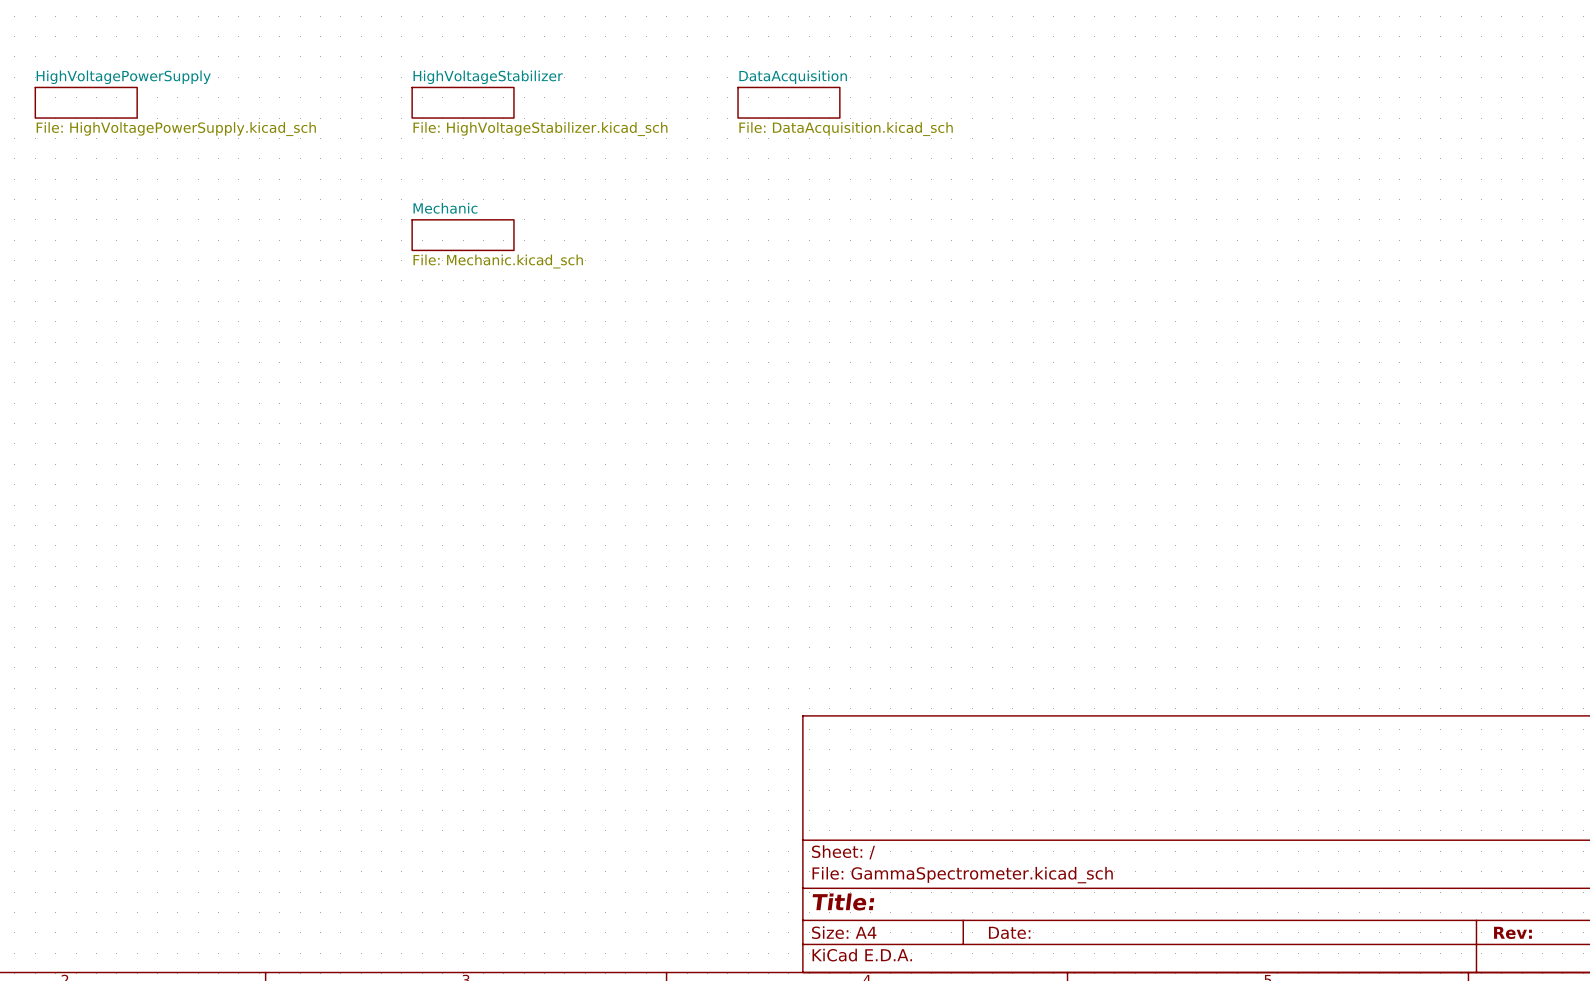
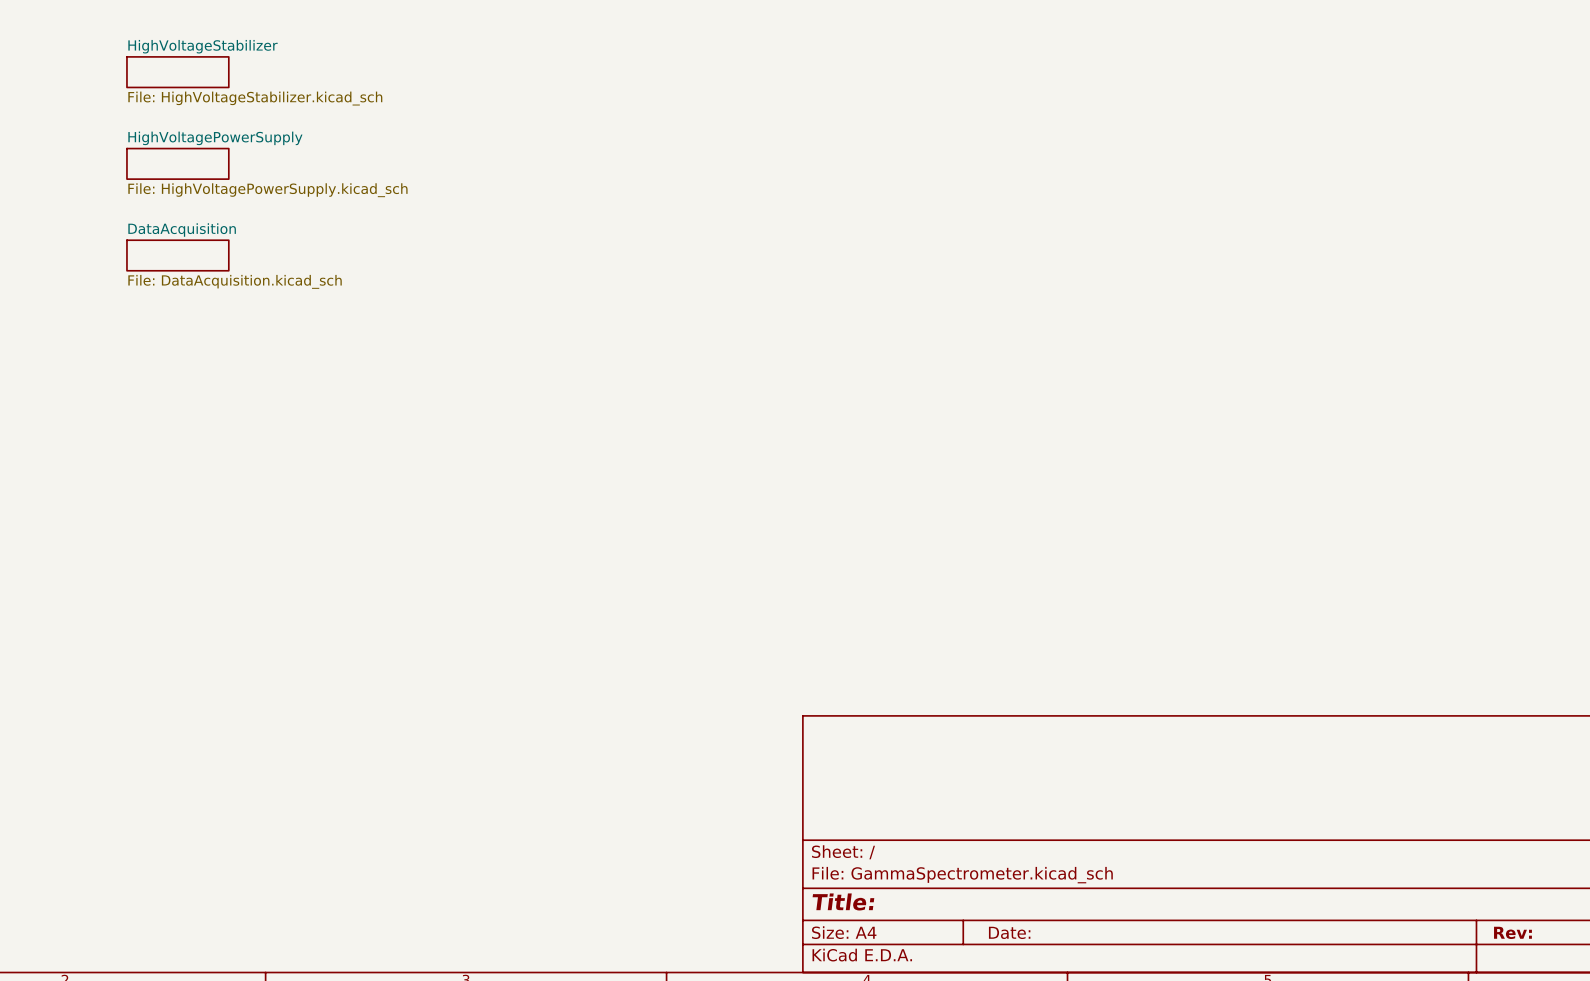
sheet HighVoltageStabilizer: none -> File: HighVoltageStabilizer.kicad_sch (177, 72)
sheet HighVoltagePowerSupply position: (86, 102) -> (177, 163)
sheet HighVoltageStabilizer: File: HighVoltageStabilizer.kicad_sch (463, 102) -> none
sheet DataAcquisition: File: DataAcquisition.kicad_sch (788, 102) -> none
sheet Mechanic: File: Mechanic.kicad_sch (463, 235) -> none
sheet DataAcquisition: none -> File: DataAcquisition.kicad_sch (177, 255)

